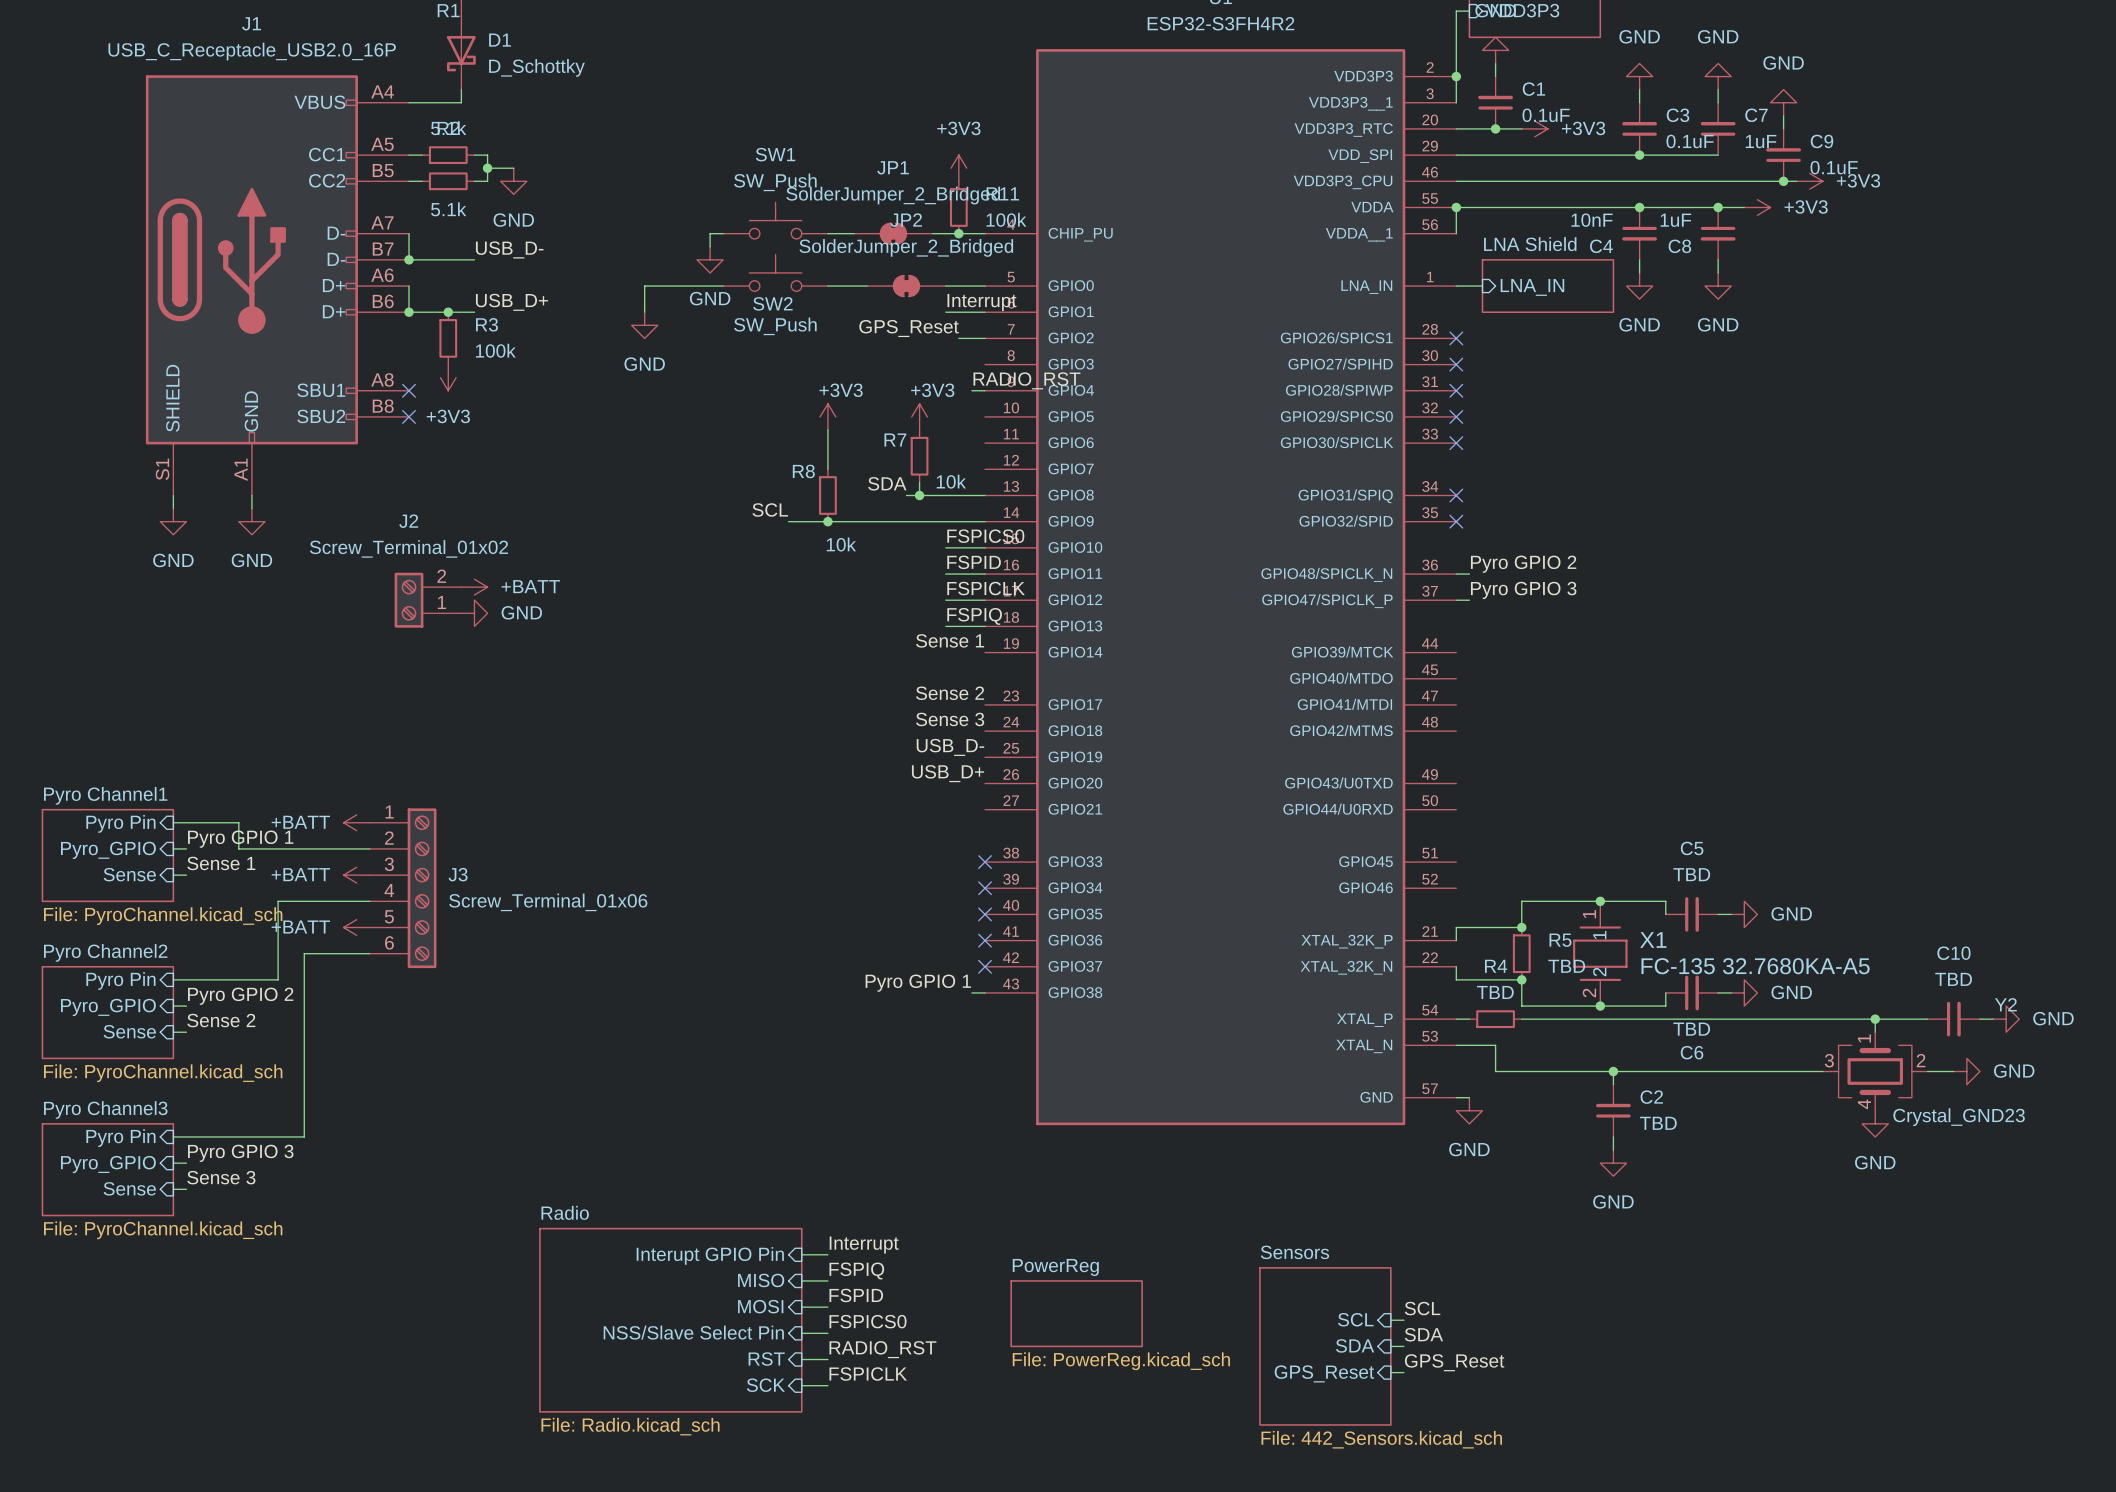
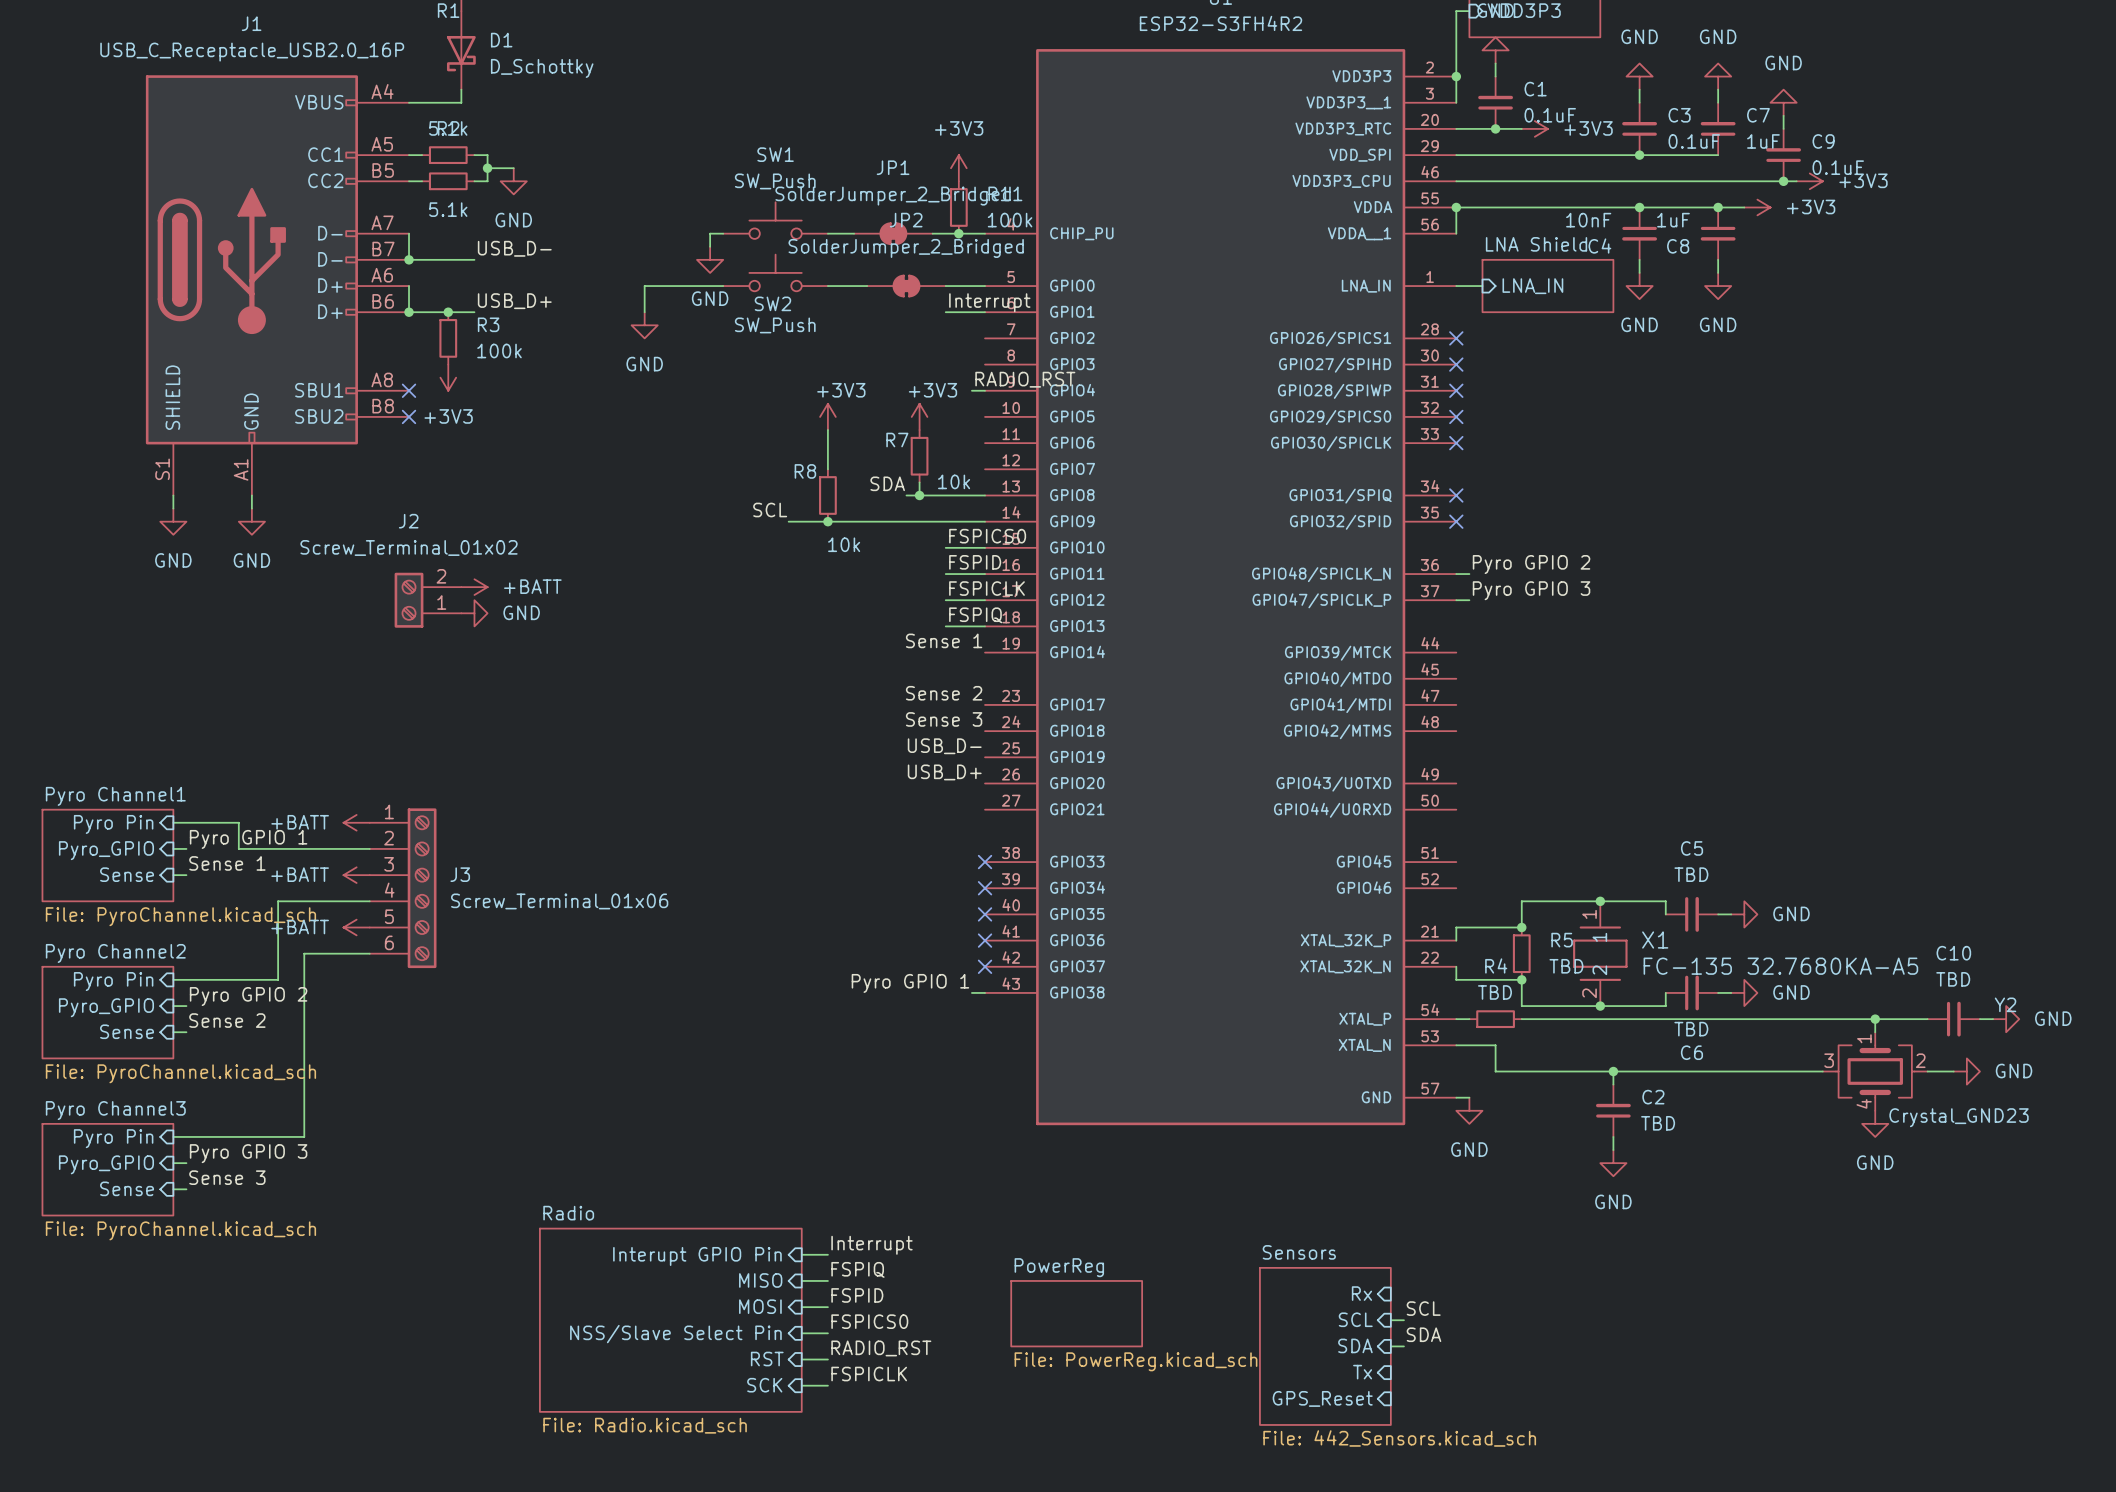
label: GPS_Reset (909, 328) -> none
wire: (958, 338) (985, 338) -> none
sheet pin: none -> Rx (1361, 1293)
label: GPS_Reset (1454, 1362) -> none
wire: (1390, 1372) (1403, 1372) -> none
sheet pin: GPS_Reset (1324, 1373) -> Tx (1362, 1372)
sheet pin: none -> GPS_Reset (1322, 1398)

